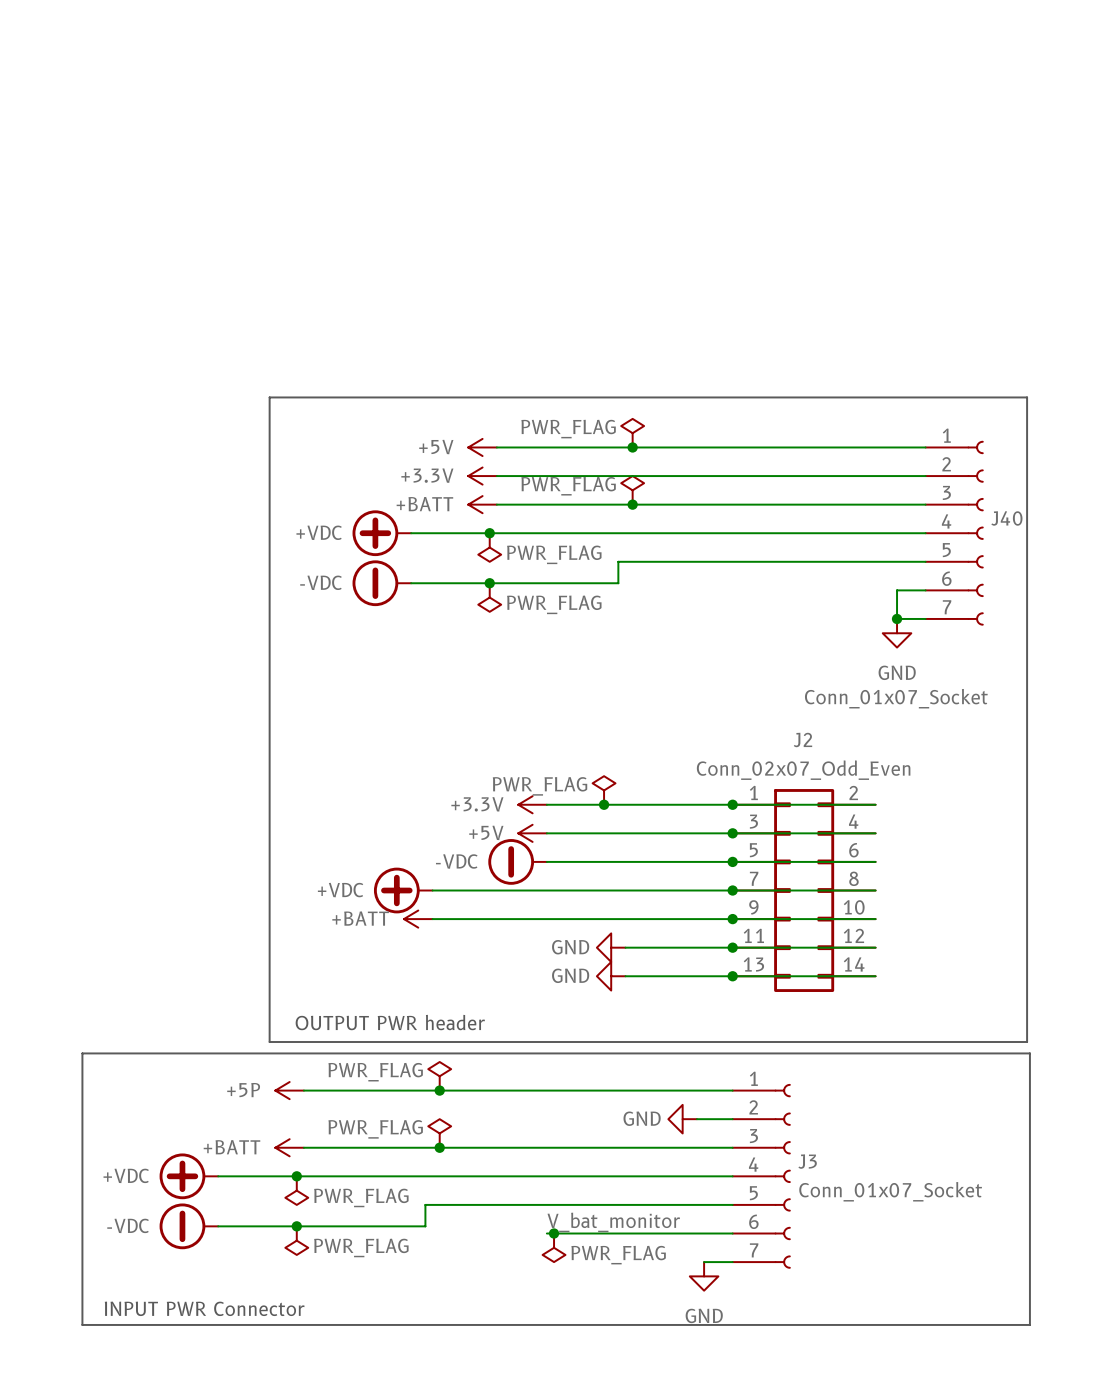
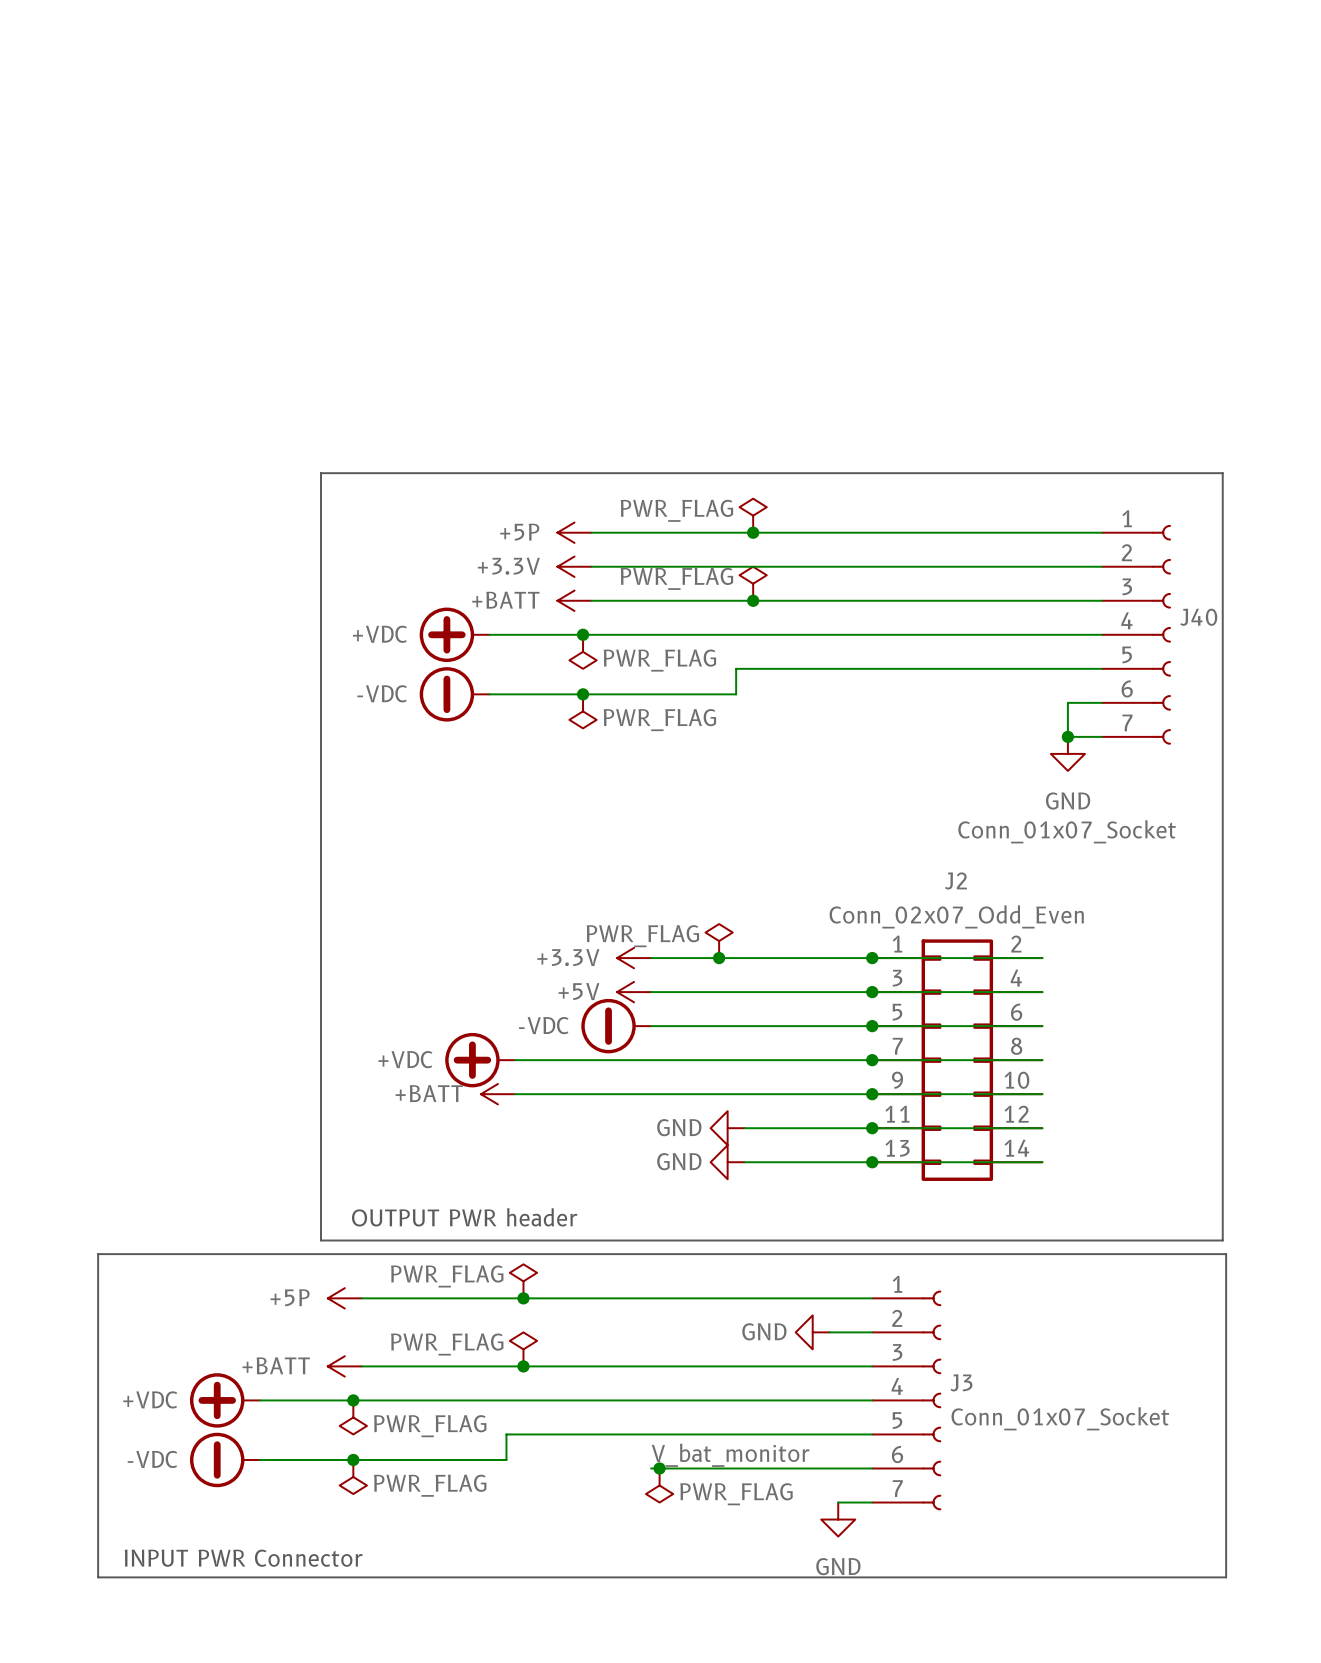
power symbol: +5V (482, 447) -> +5P (574, 532)

